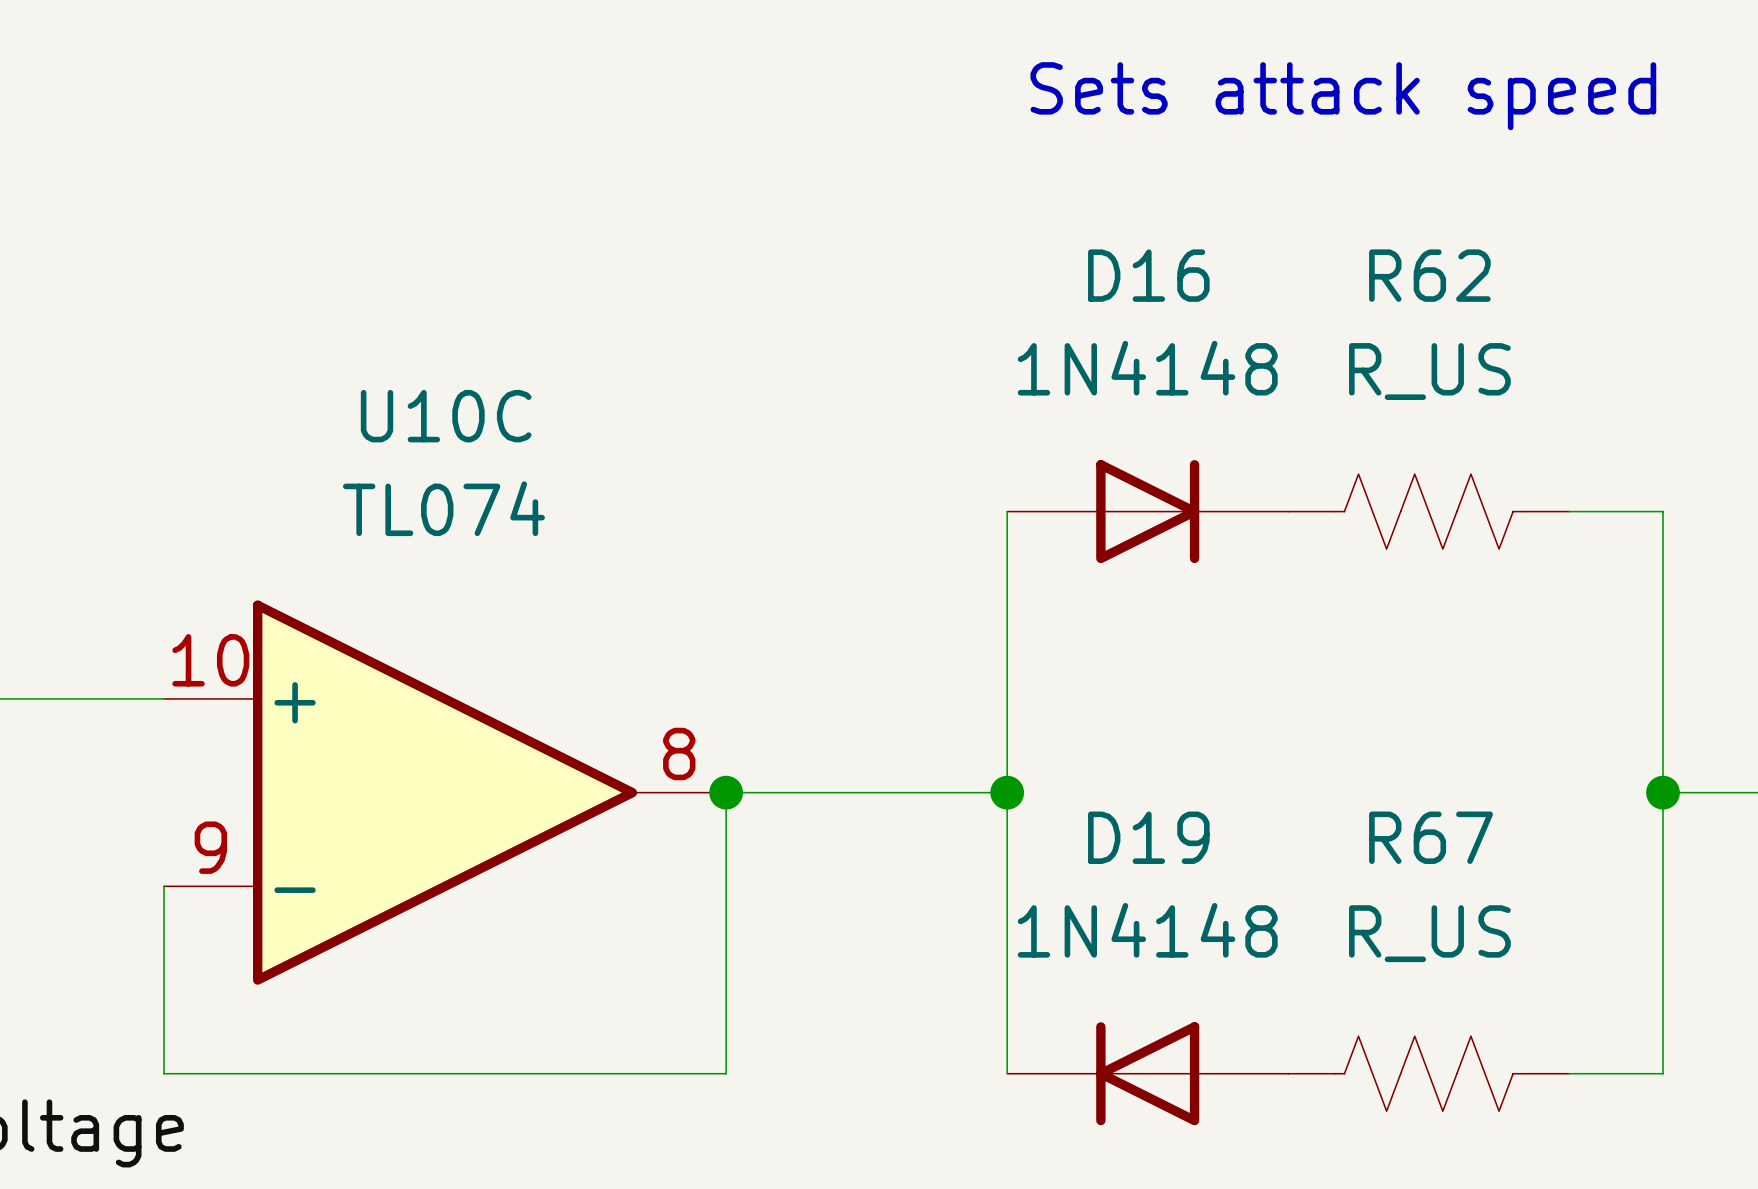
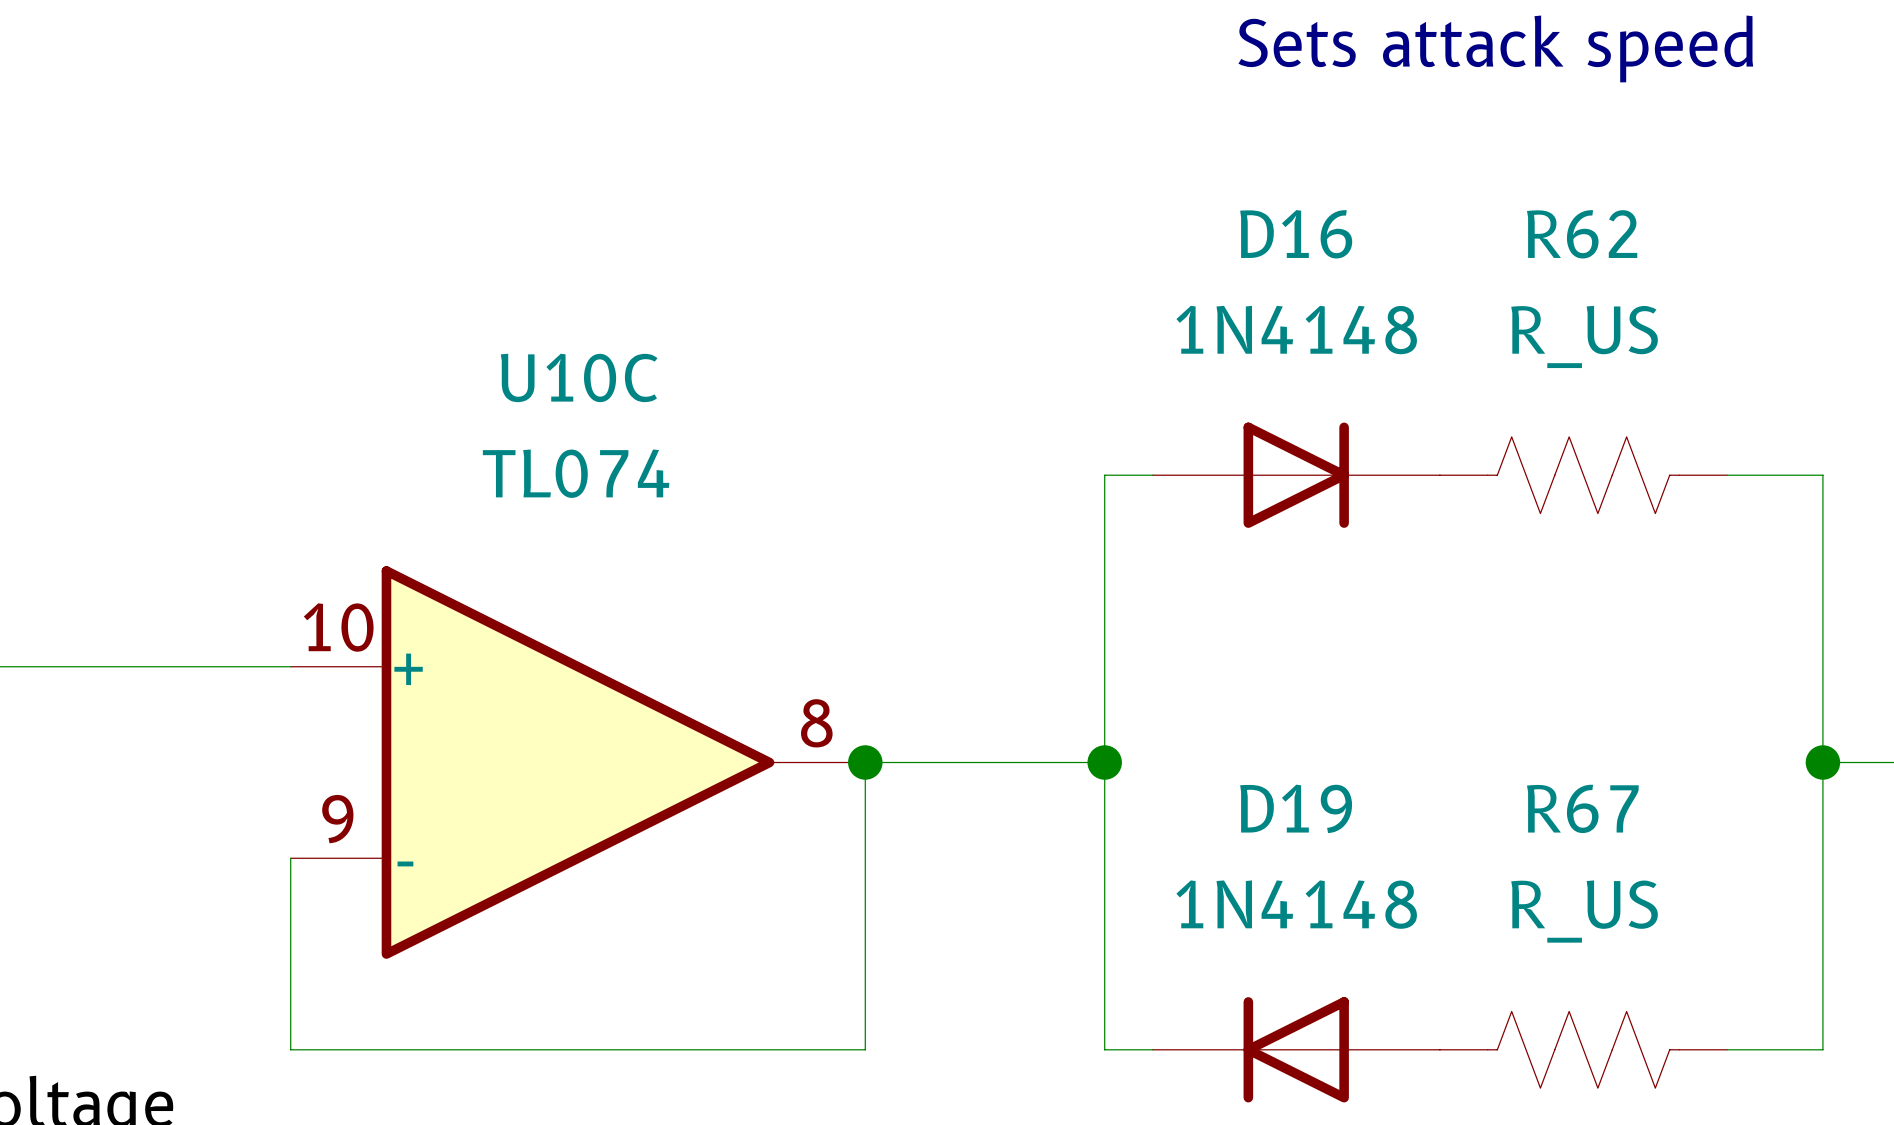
wire: (1007, 511) (1007, 1073) -> (1152, 475) (1104, 475) (1104, 1049) (1152, 1049)
wire: (960, 792) (1007, 792) -> none
junction position: (1007, 792) -> (1104, 762)

